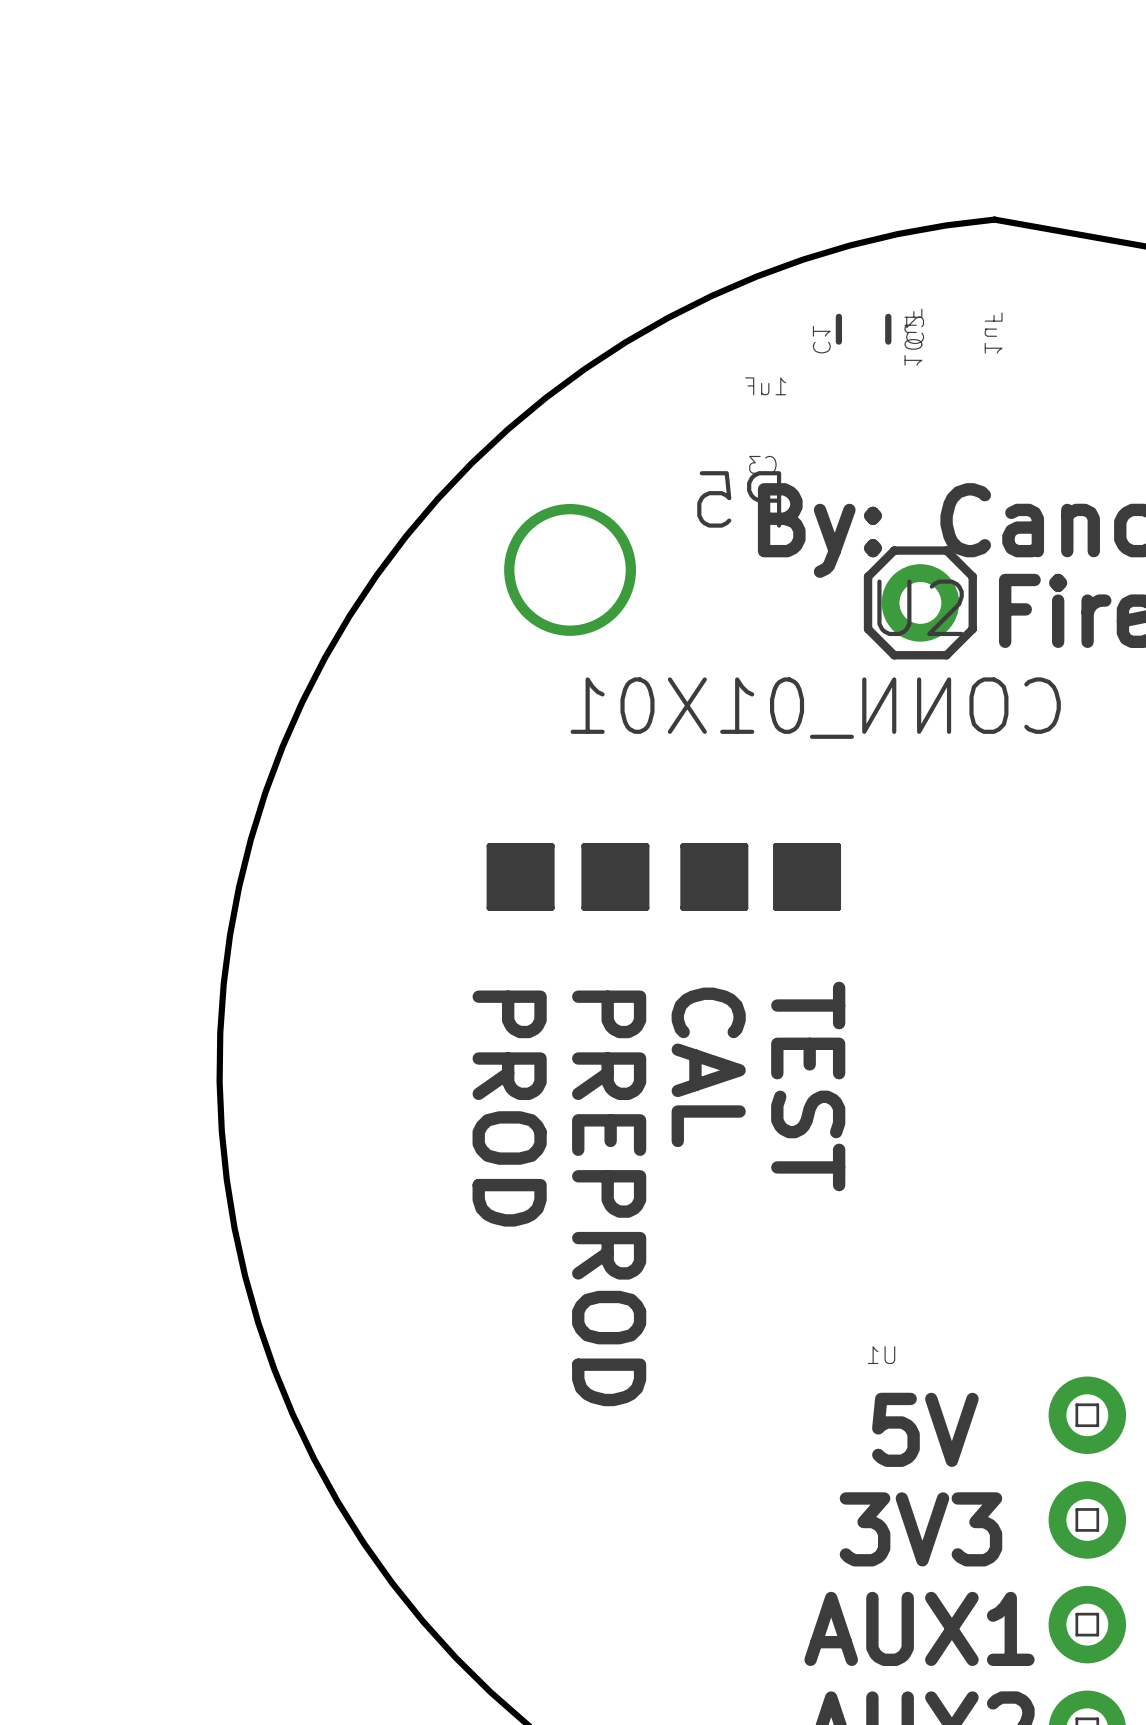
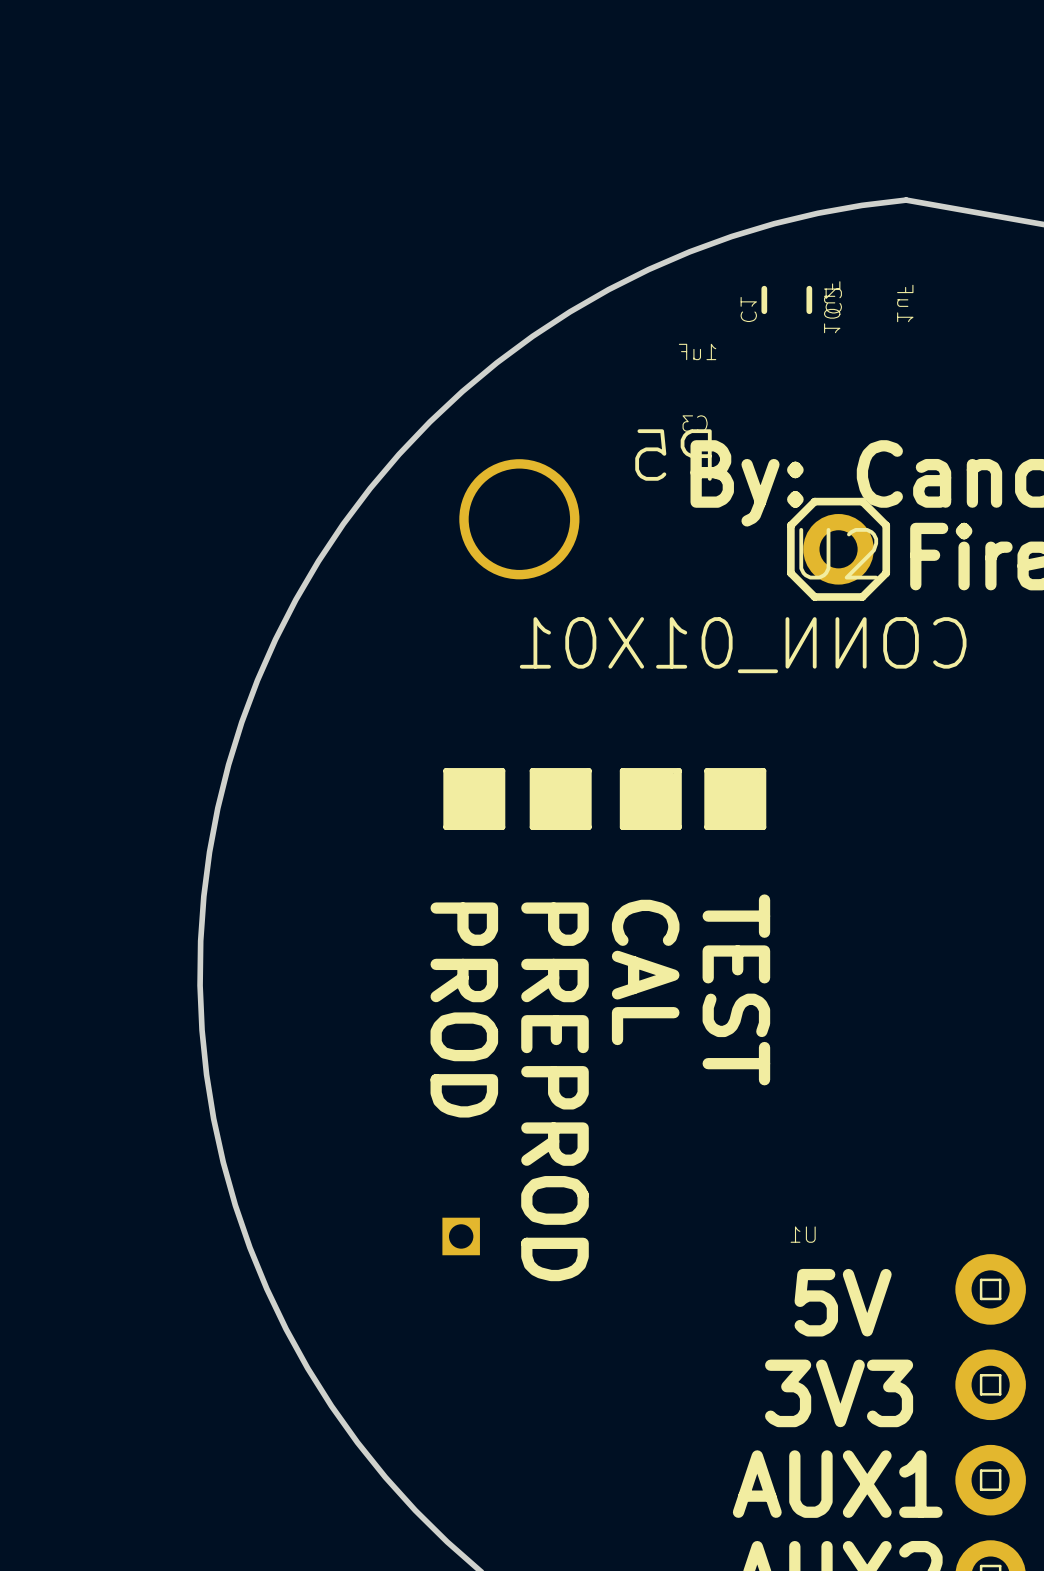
part: none -> (461, 1236)

